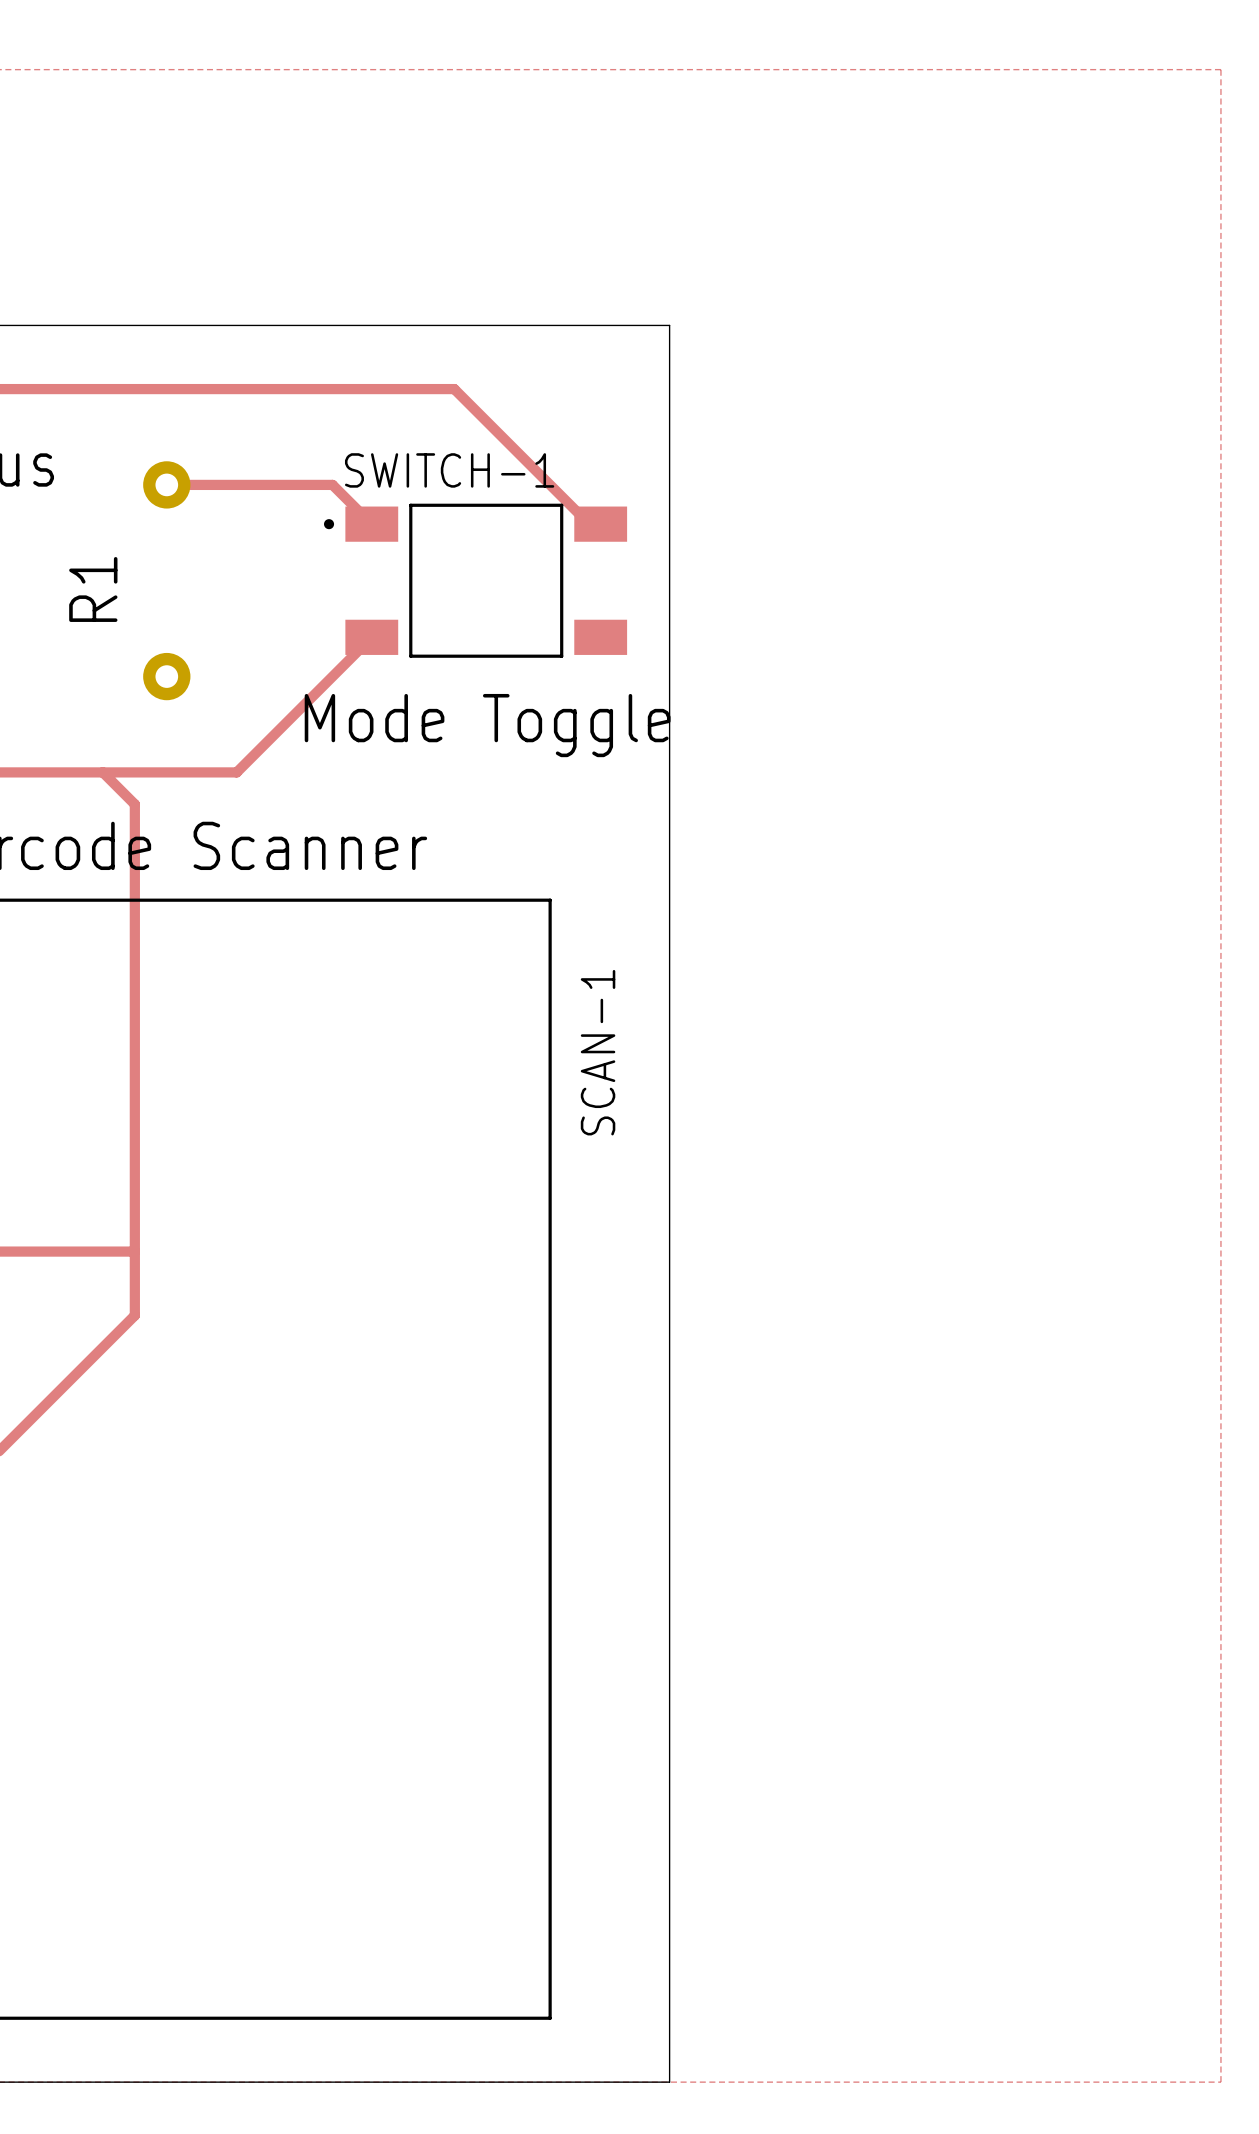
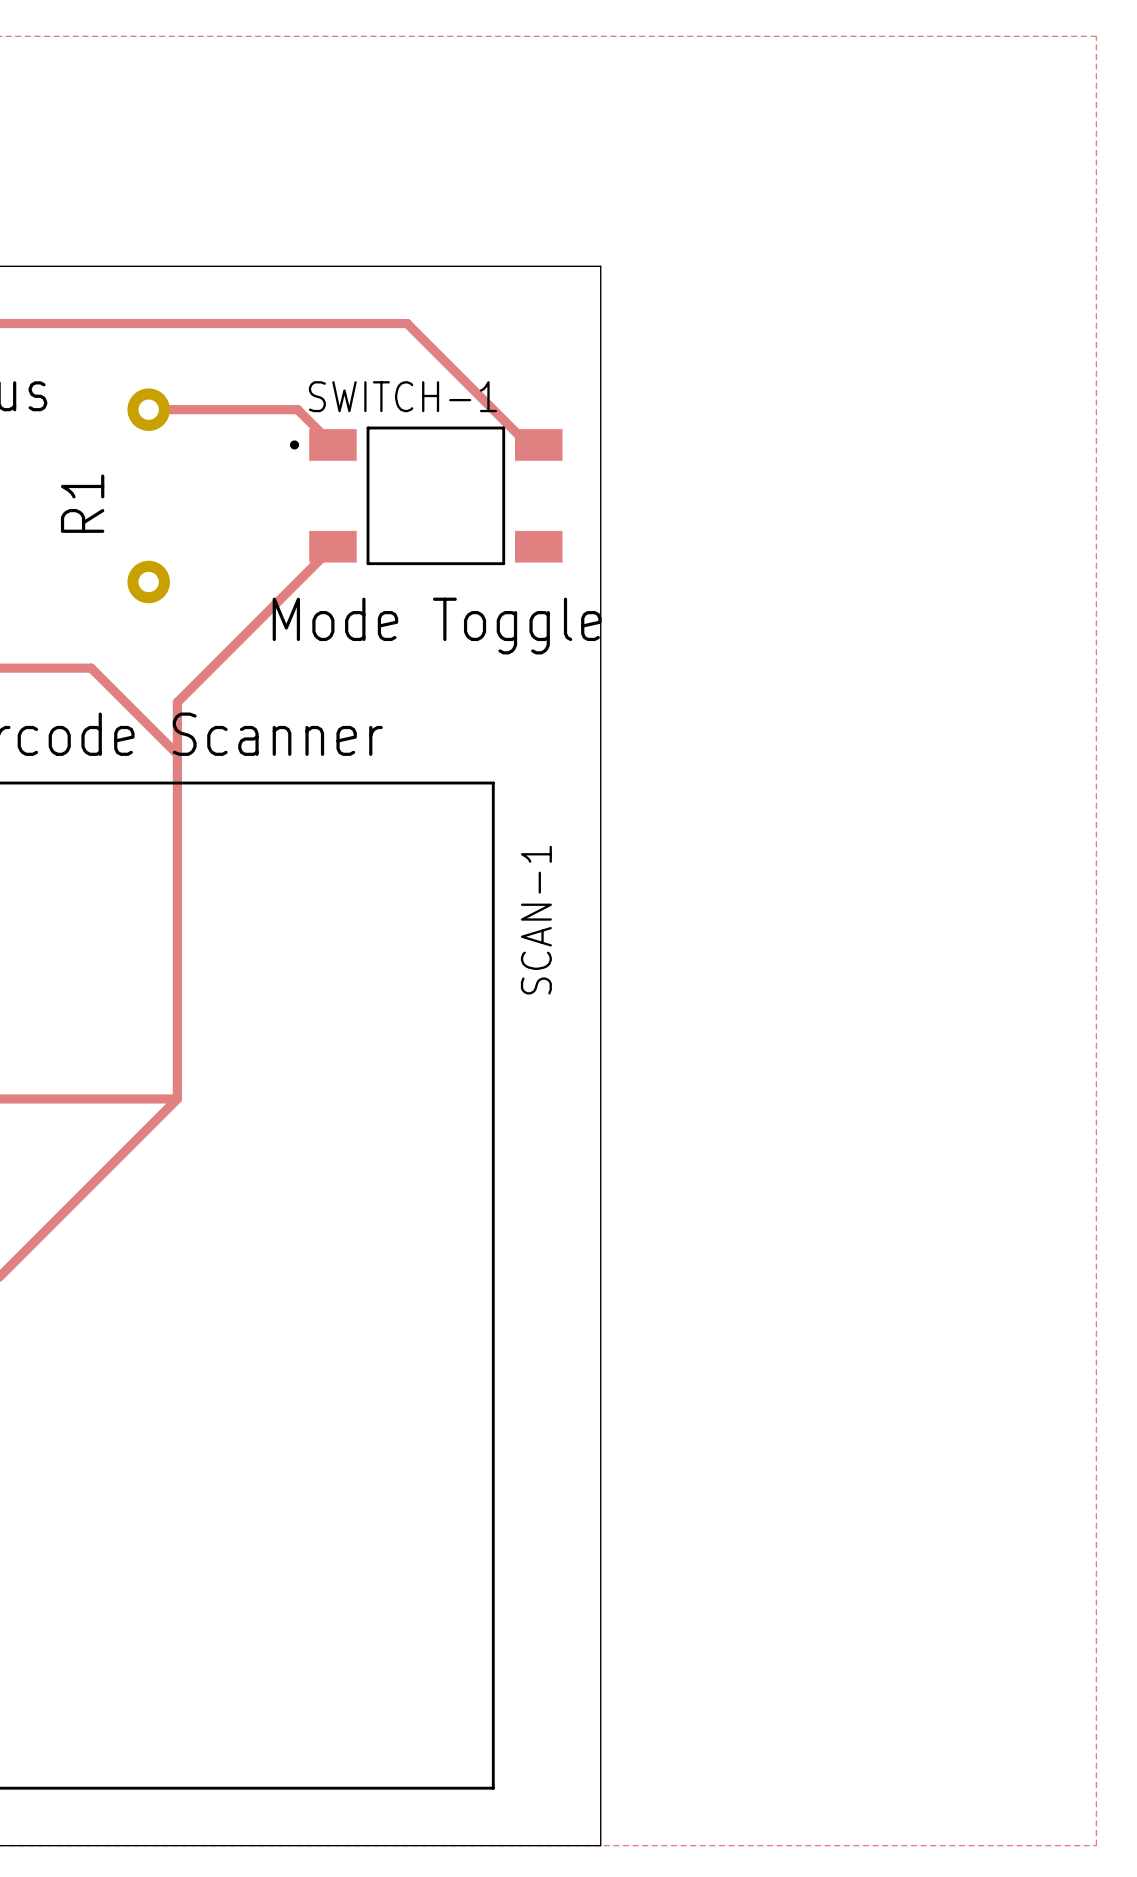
top track: (102, 772) (236, 772) -> (177, 1098) (177, 702) (211, 668)
top track: (134, 804) (134, 1315) -> (177, 1098) (119, 1156)
top track: none -> (119, 696) (177, 754)
top track: none -> (119, 1098) (177, 1098)

